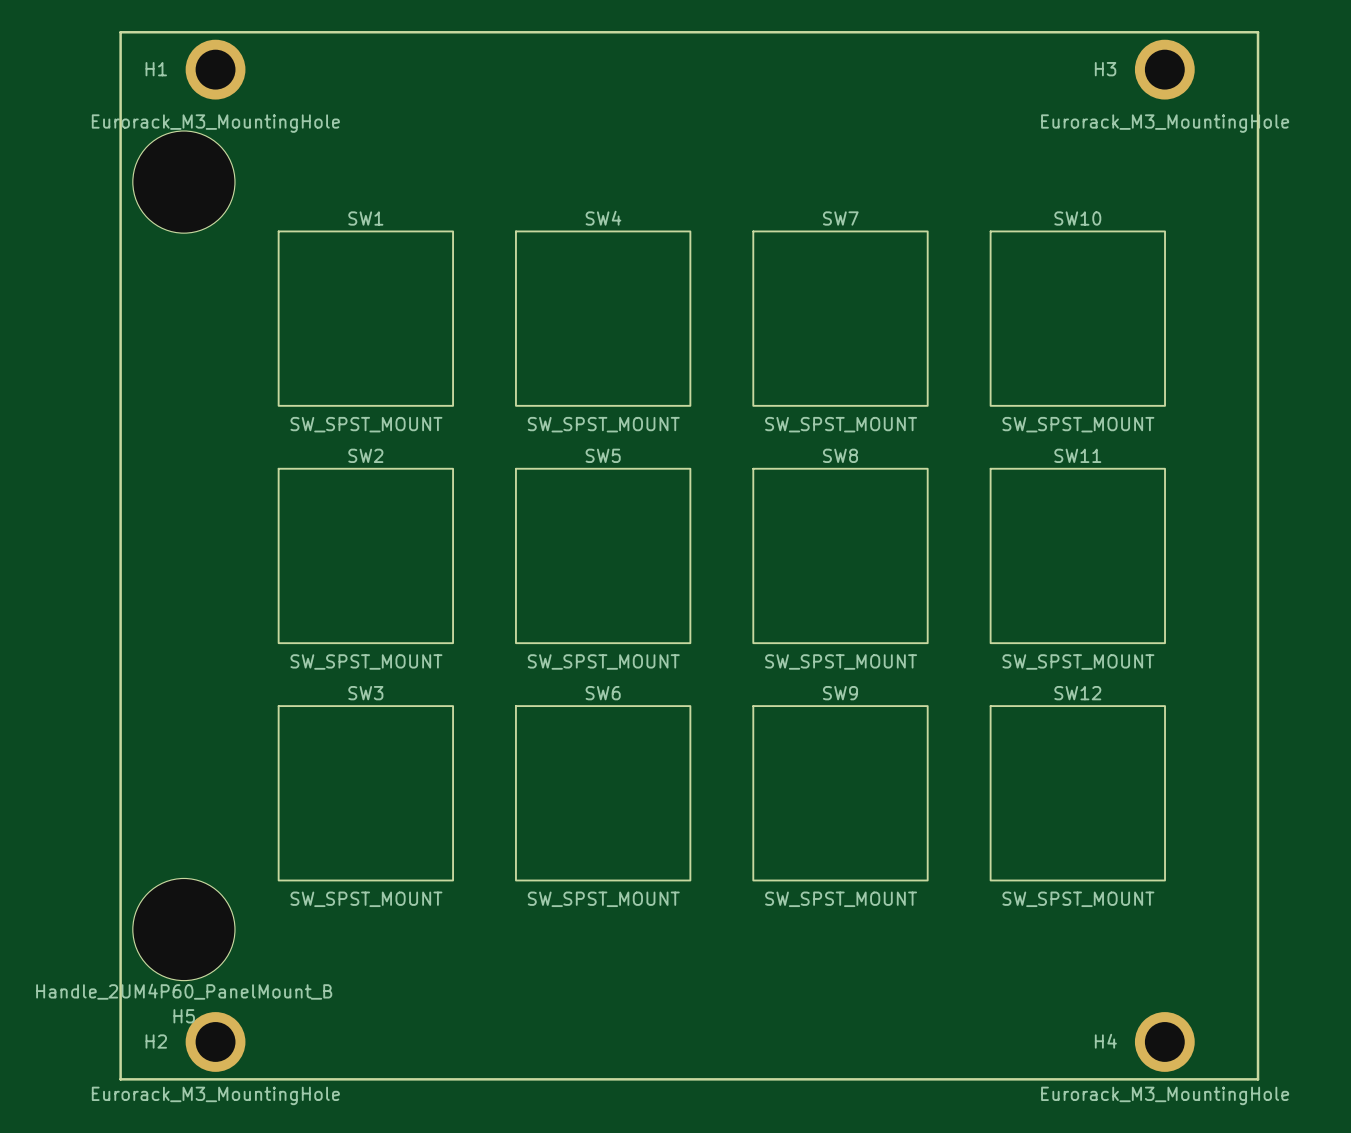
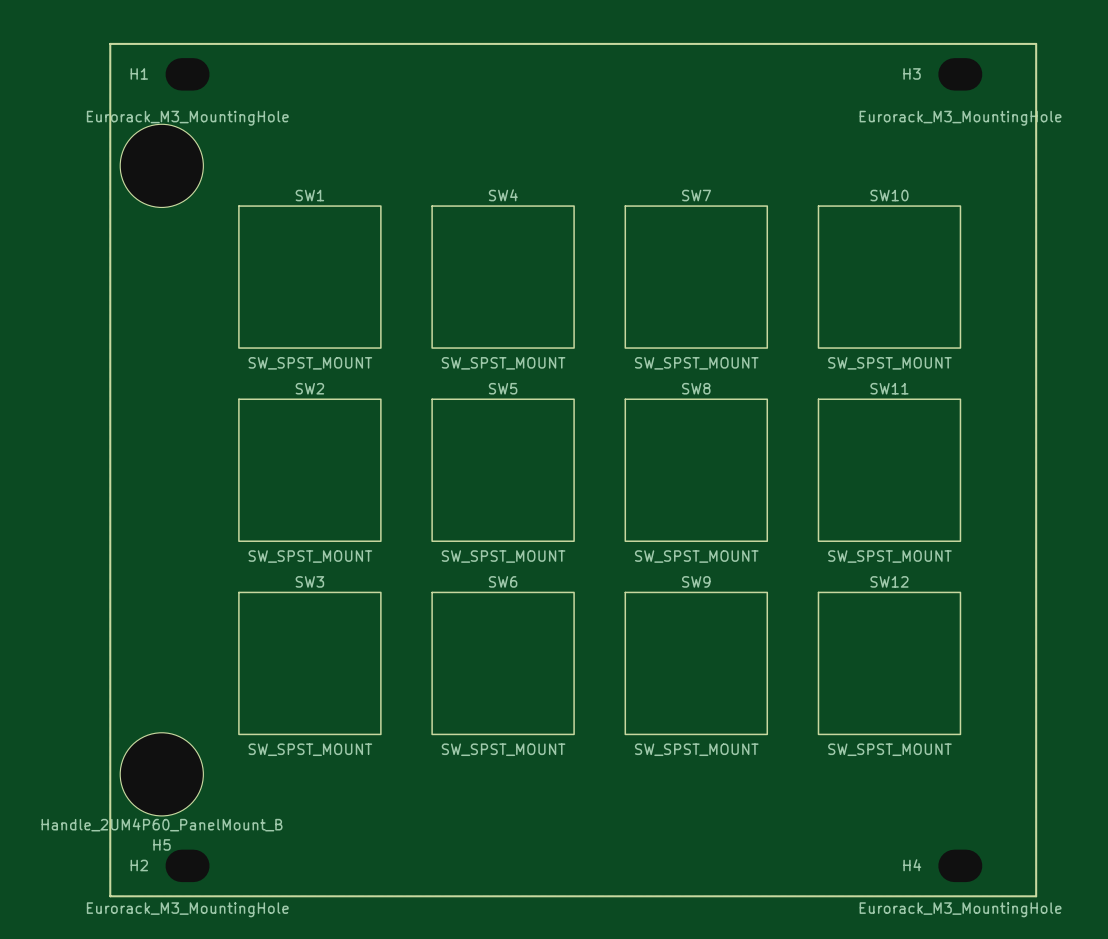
H1 footprint: [185, 39, 246, 100] -> [165, 58, 210, 91]
H3 footprint: [1134, 39, 1195, 100] -> [938, 58, 983, 91]
H2 footprint: [185, 1012, 246, 1072] -> [165, 849, 210, 883]
H4 footprint: [1134, 1012, 1195, 1072] -> [938, 849, 983, 883]

